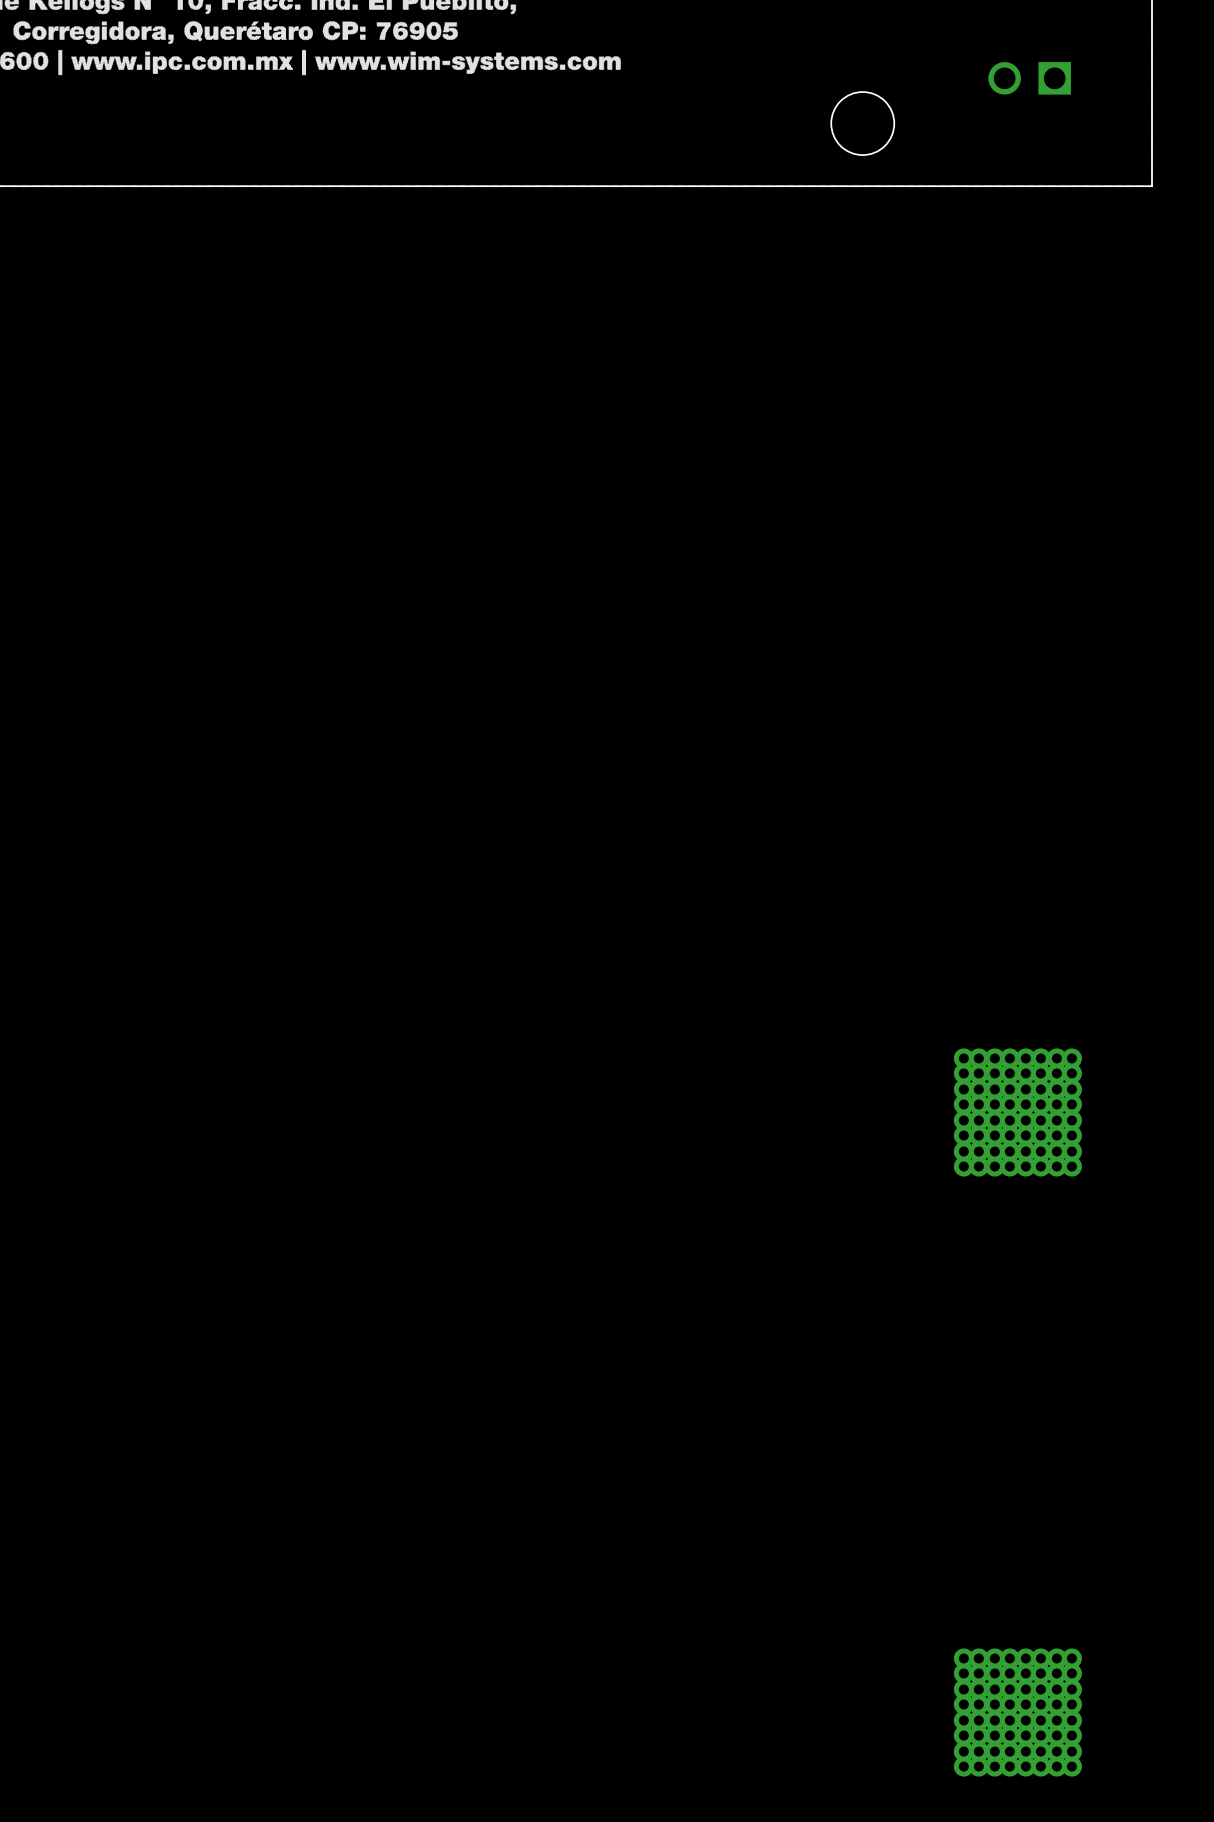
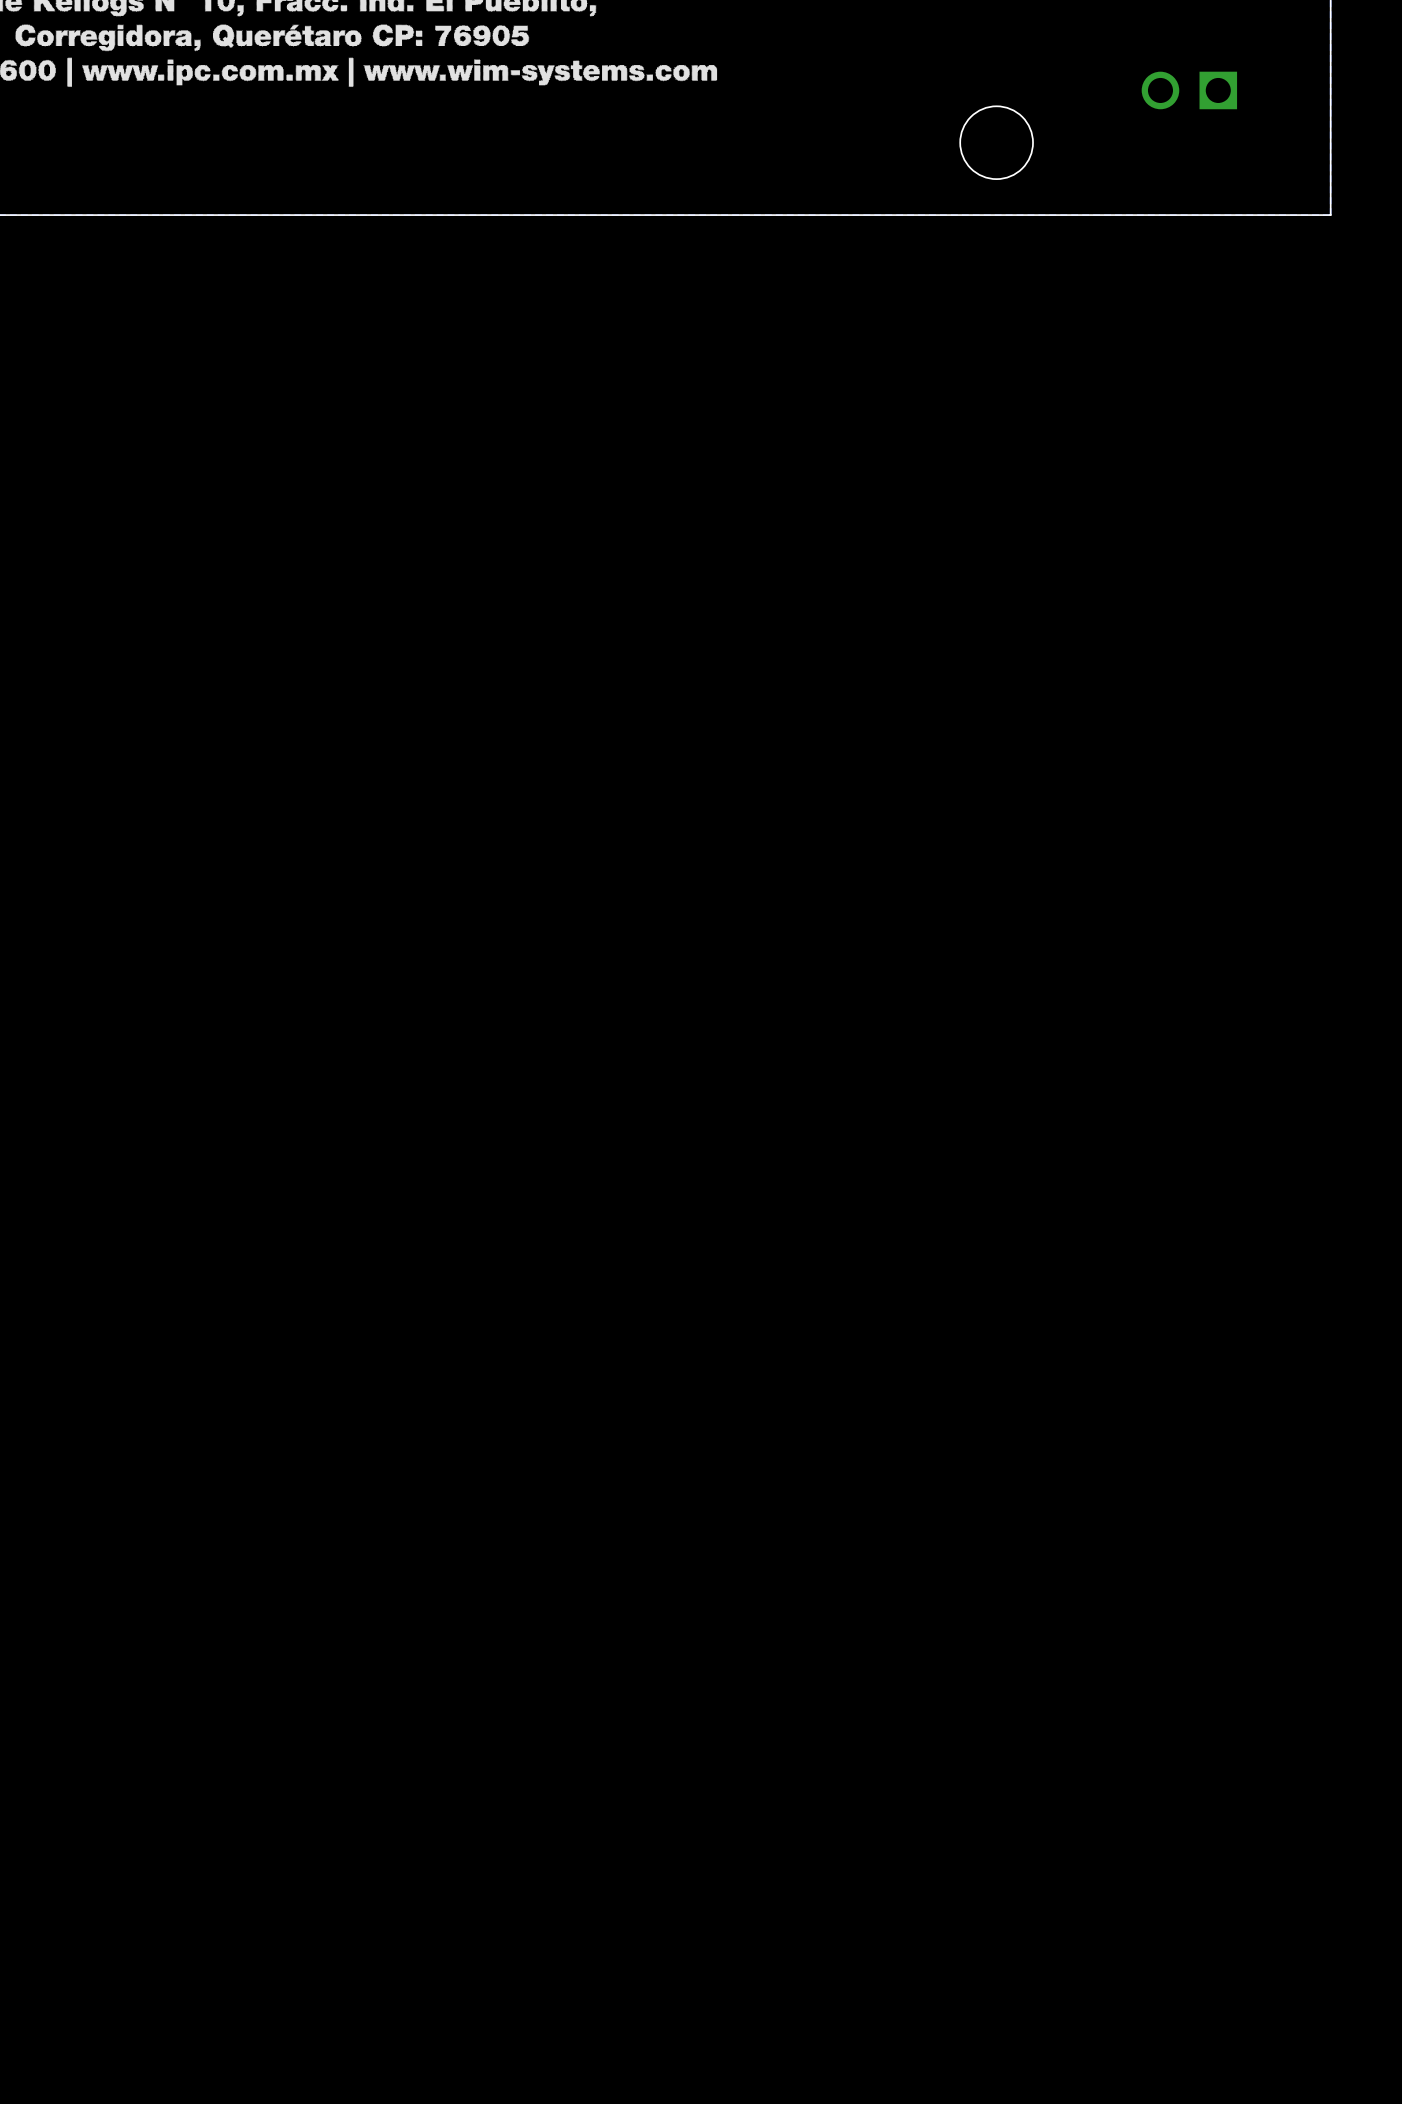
part: (1017, 1112) -> none
part: (1017, 1712) -> none

